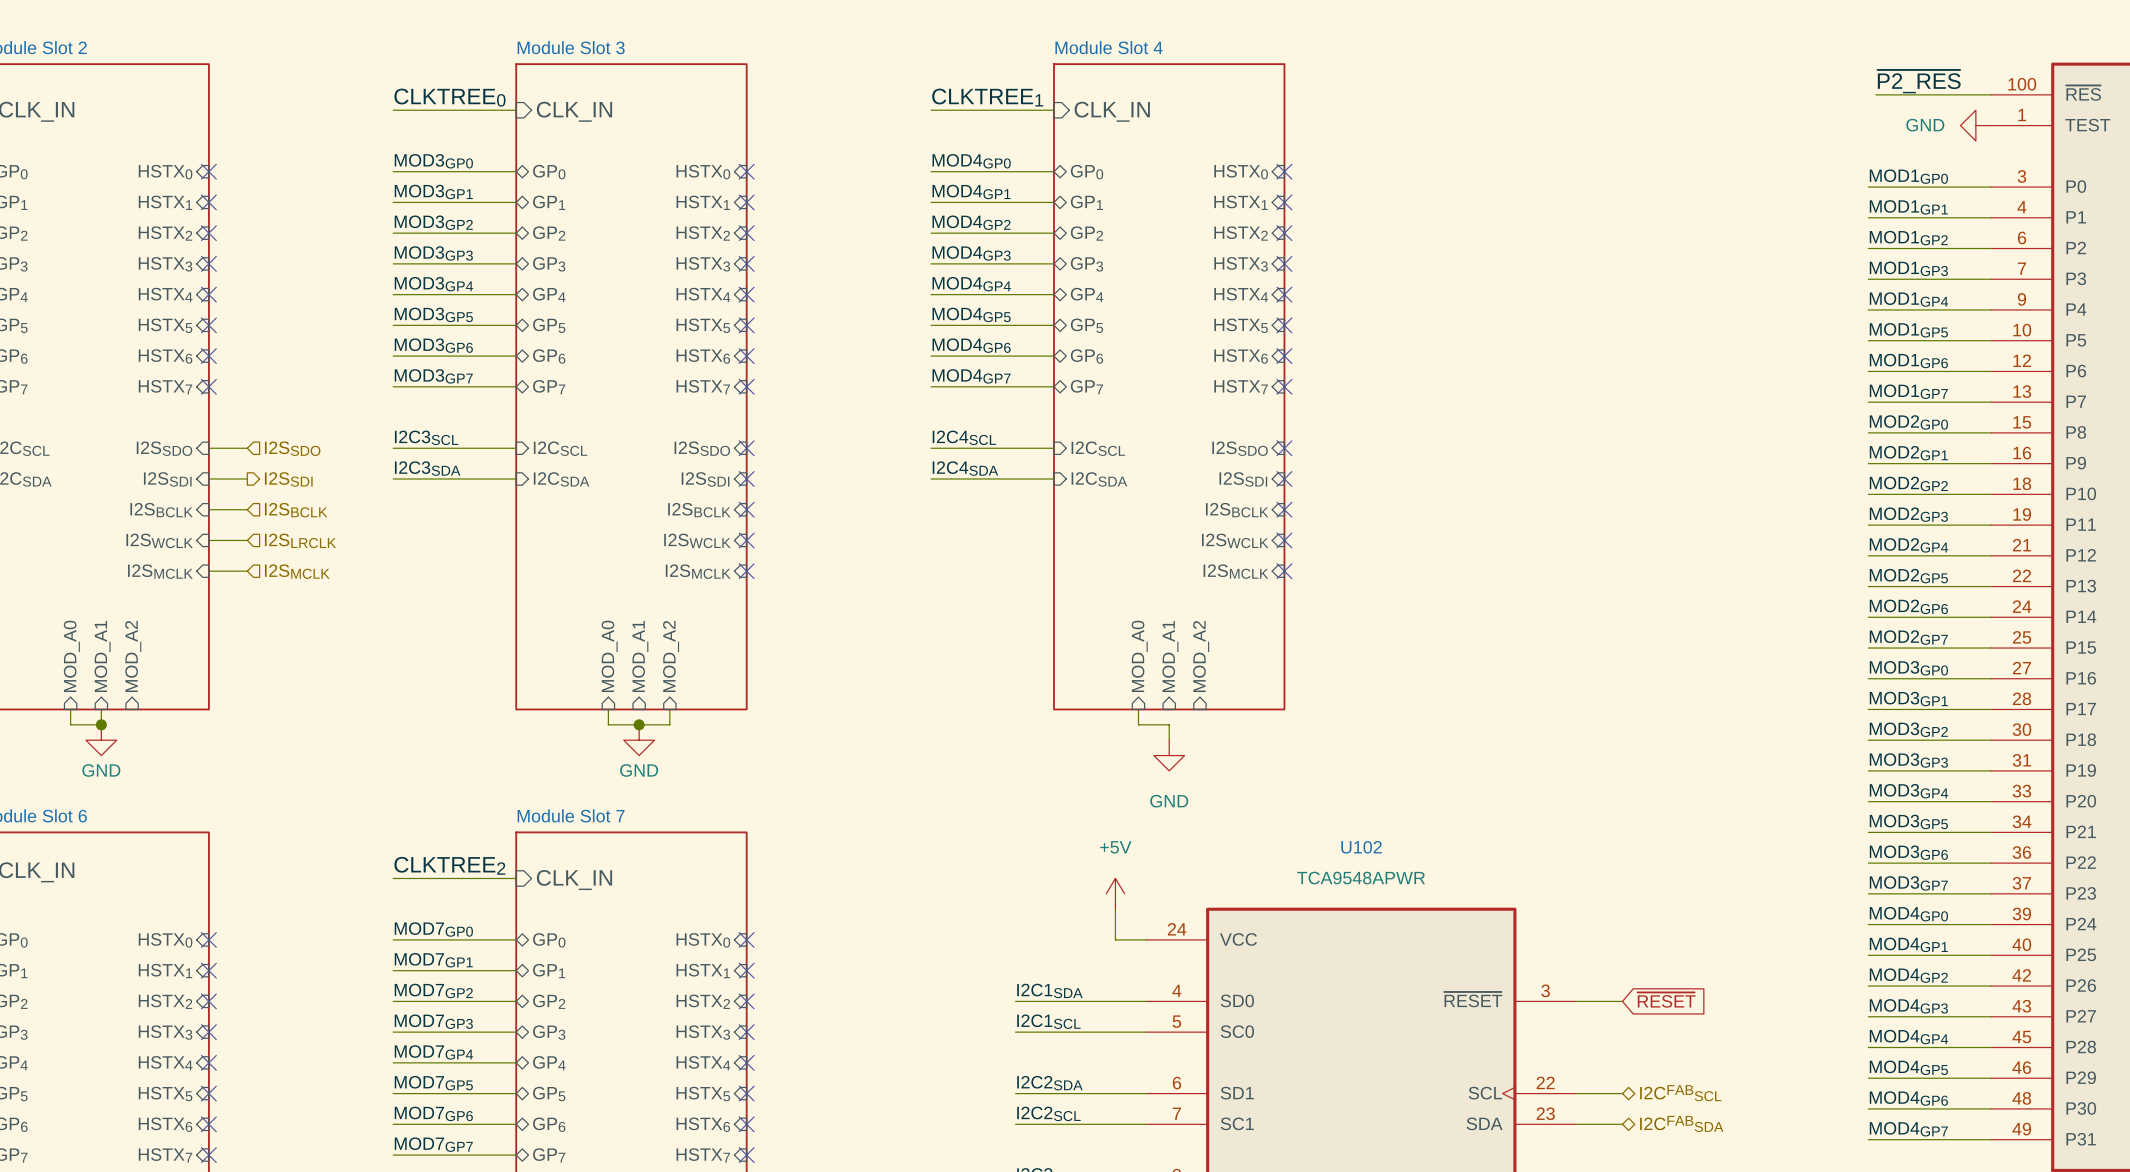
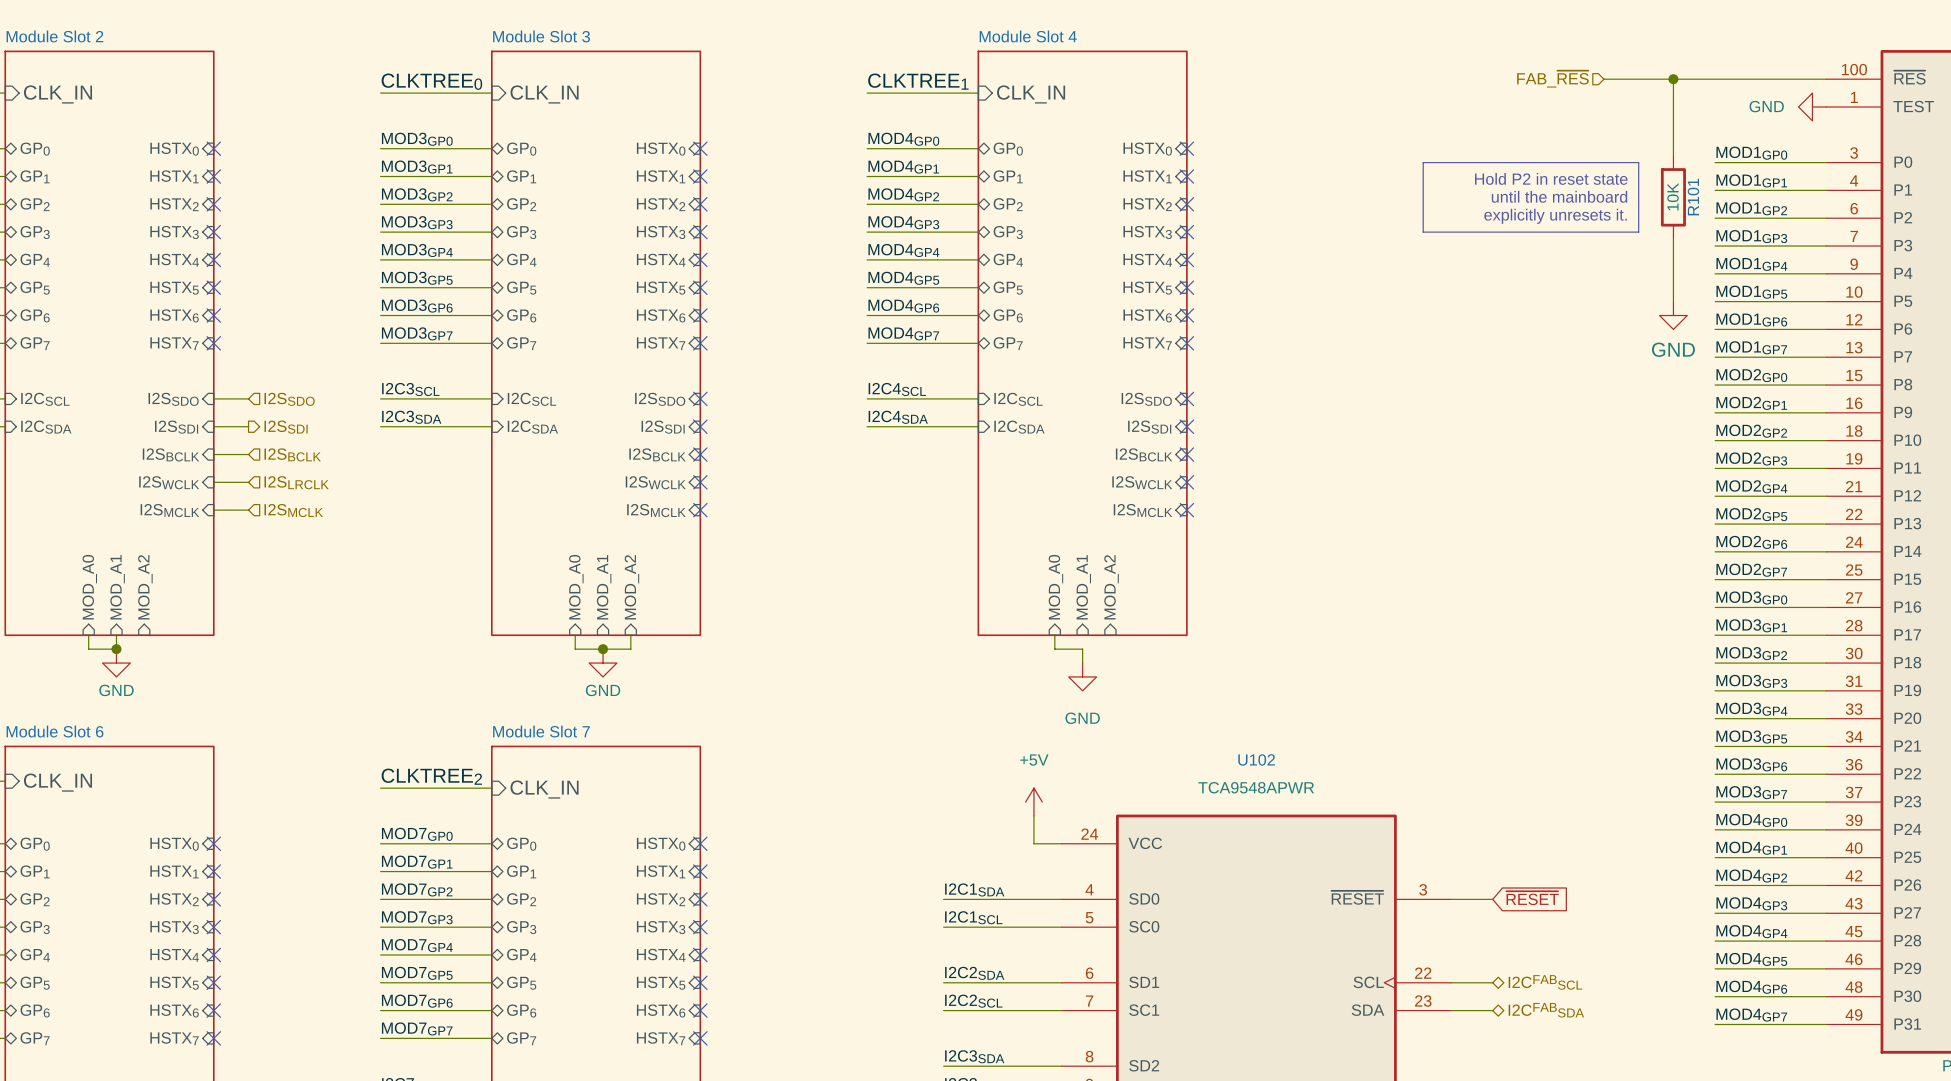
label: ~{P2_RES} (1919, 81) -> none
hierarchical label: none -> FAB_~{RES} (1552, 79)
wire: none -> (1603, 79) (1722, 79)
wire: none -> (1673, 79) (1673, 155)
junction: none -> (1673, 79)
line: none -> (1423, 162) (1638, 162) (1638, 232) (1423, 232) (1423, 162)
text: none -> Hold P2 in reset state (1551, 178)
text: none -> until the mainboard (1559, 196)
R101: none -> 10K (1673, 197)
text: none -> explicitly unresets it. (1555, 216)
wire: none -> (1673, 239) (1673, 301)
power symbol: none -> GND (1673, 315)

